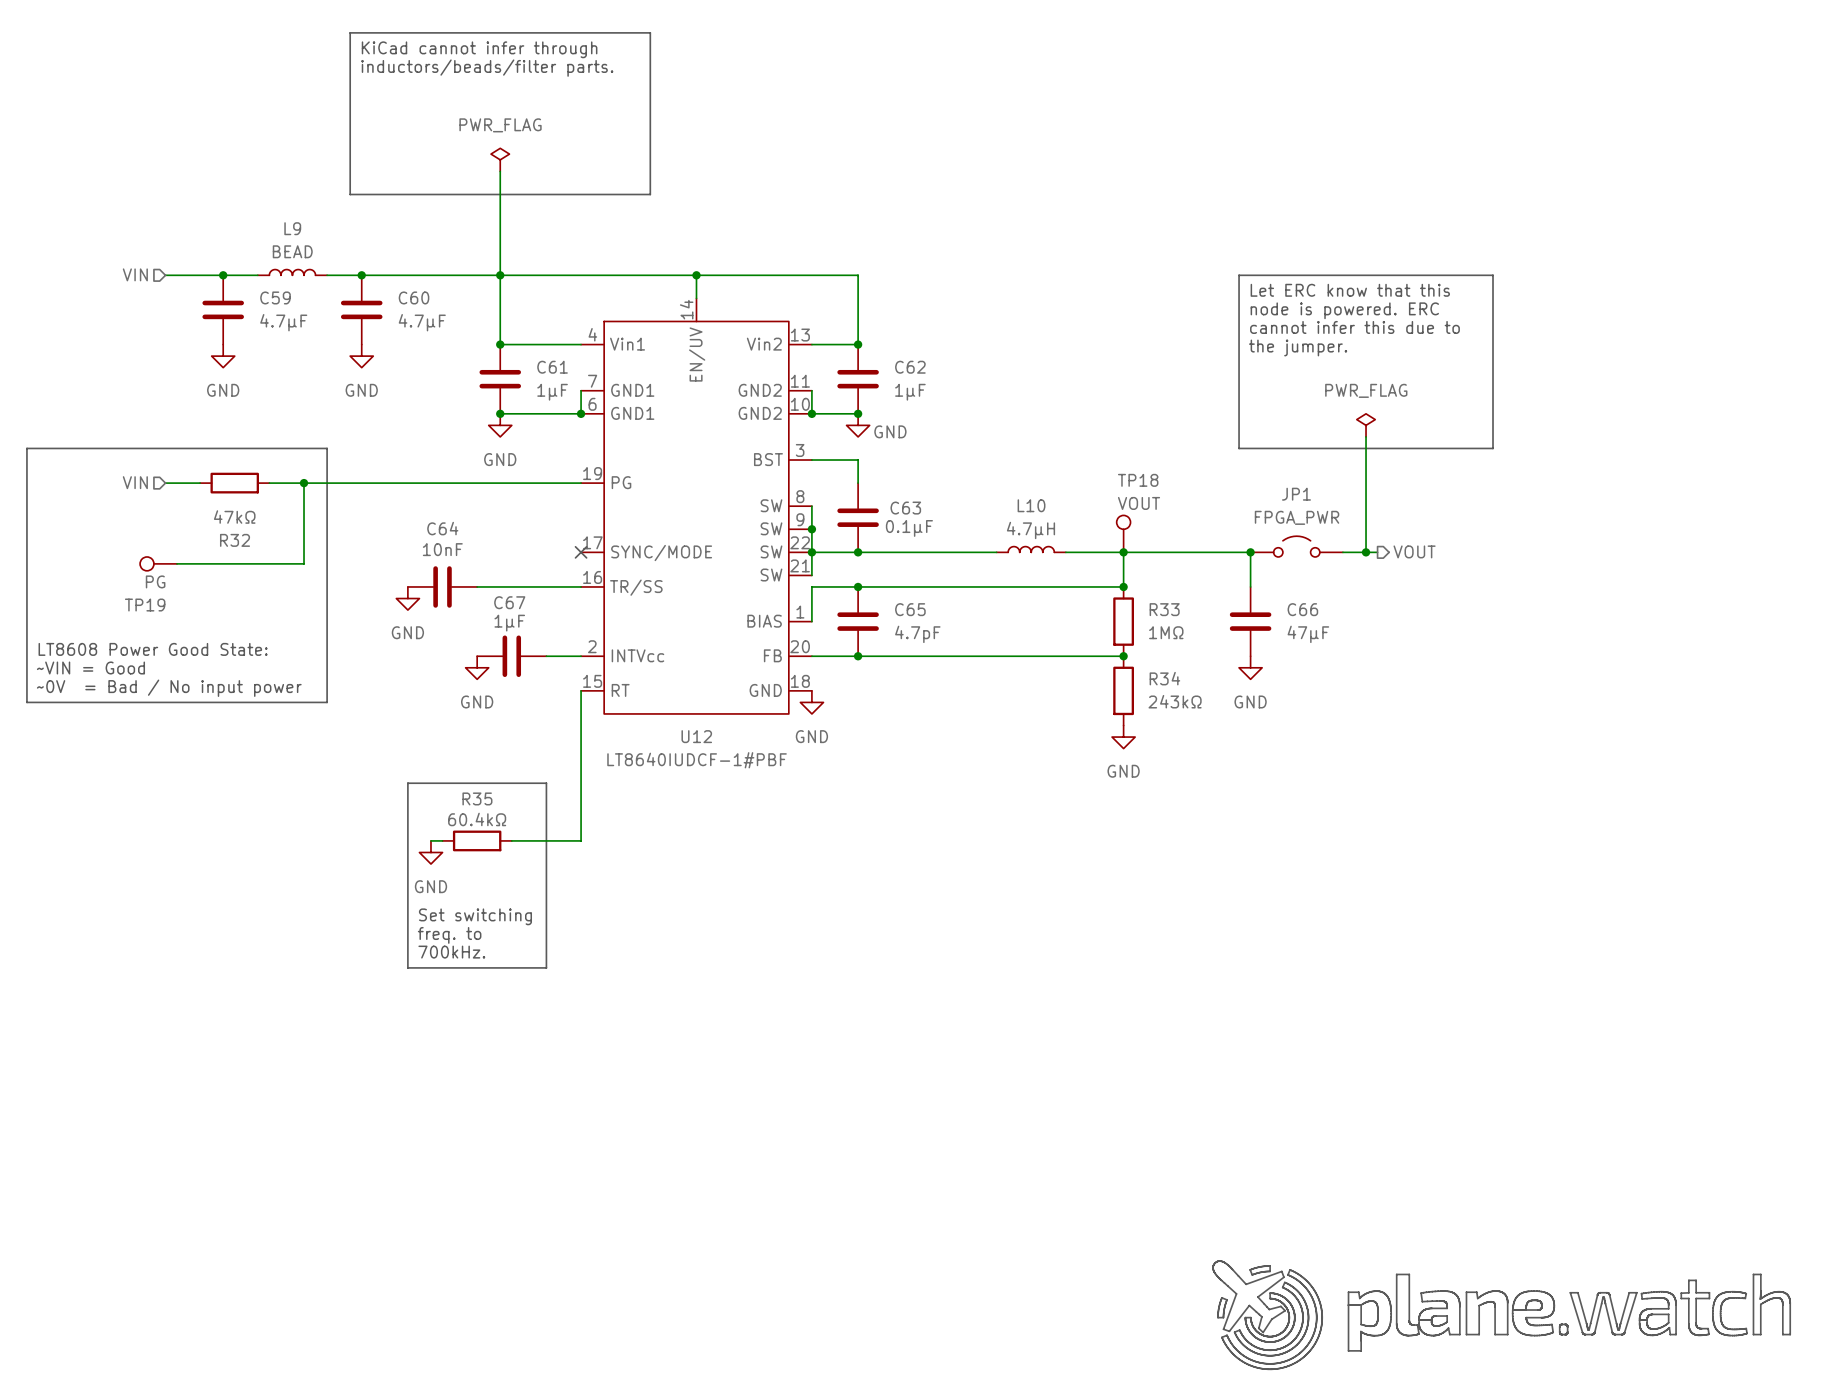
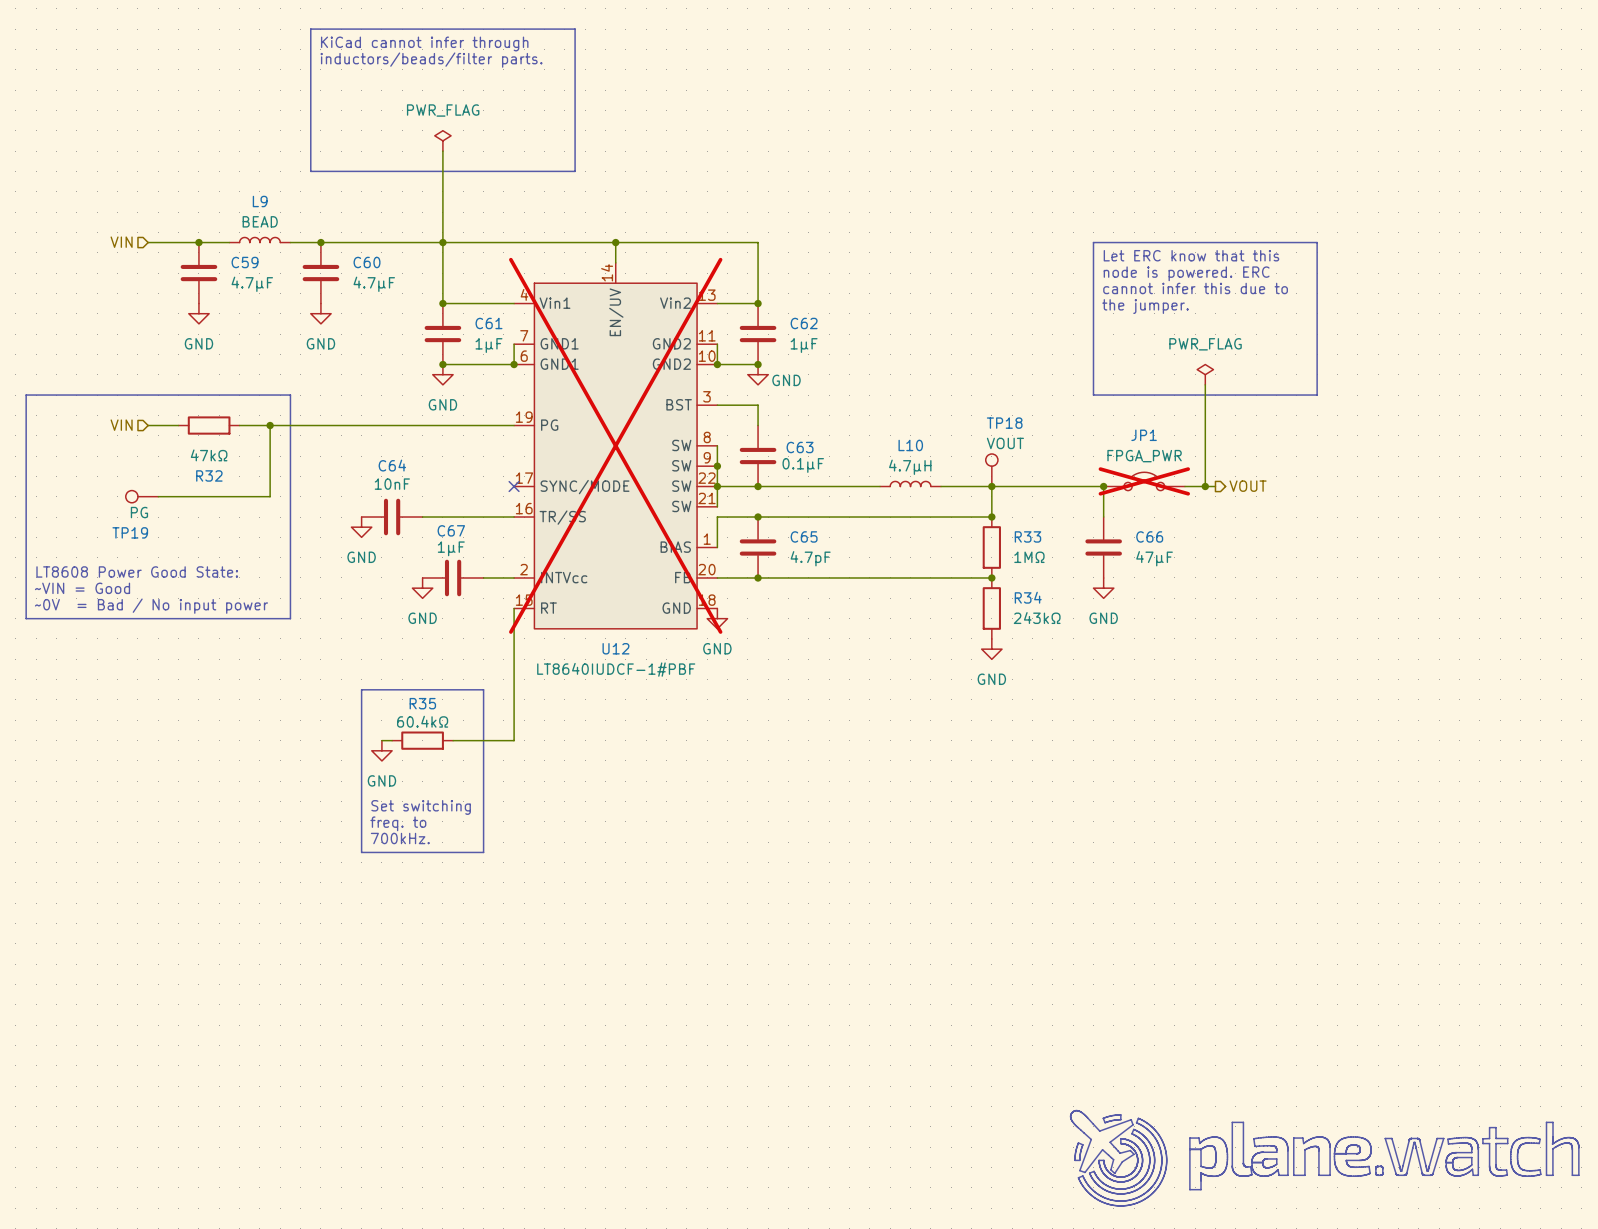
U12 do-not-place cross: none -> (615, 445)
JP1 do-not-place cross: none -> (1144, 481)

